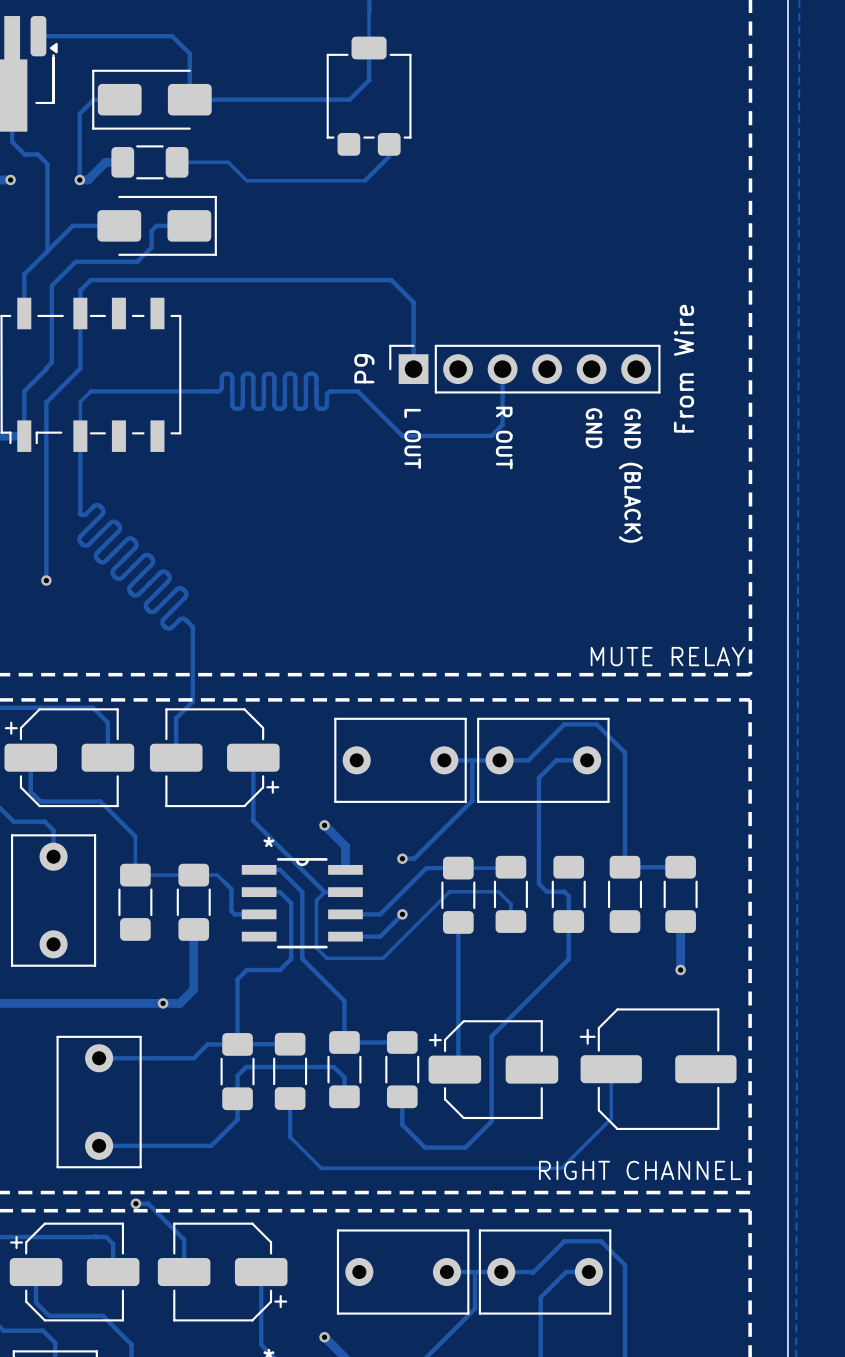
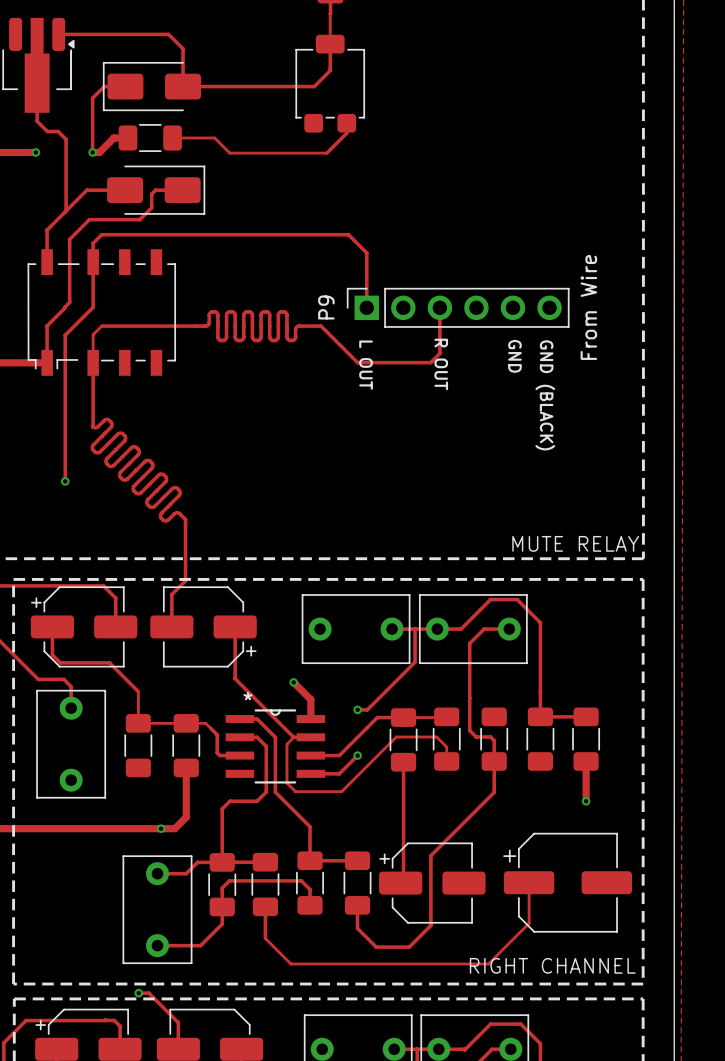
track: (99, 1058) (158, 1058) -> none
part position: (99, 1102) -> (157, 909)
track: (99, 1145) (158, 1145) -> none

